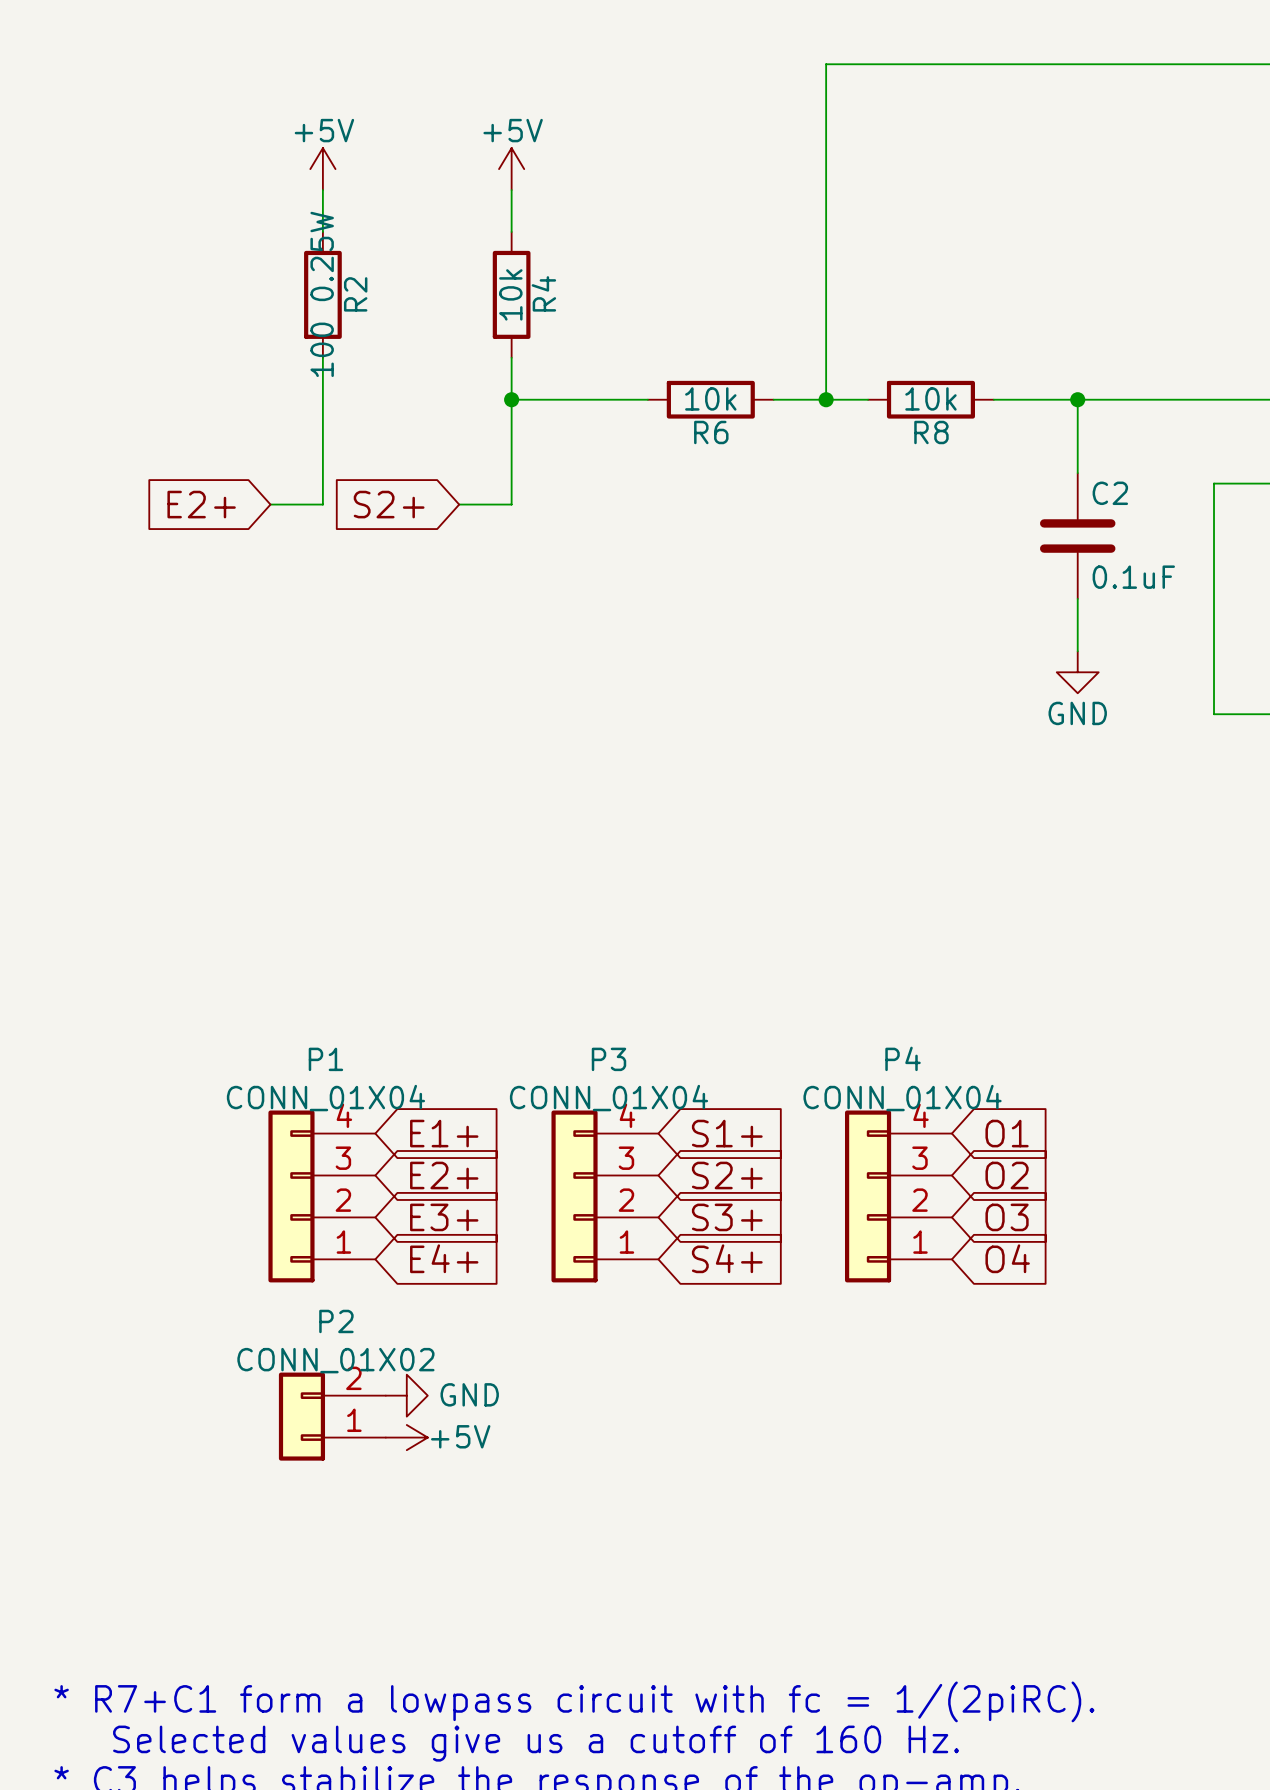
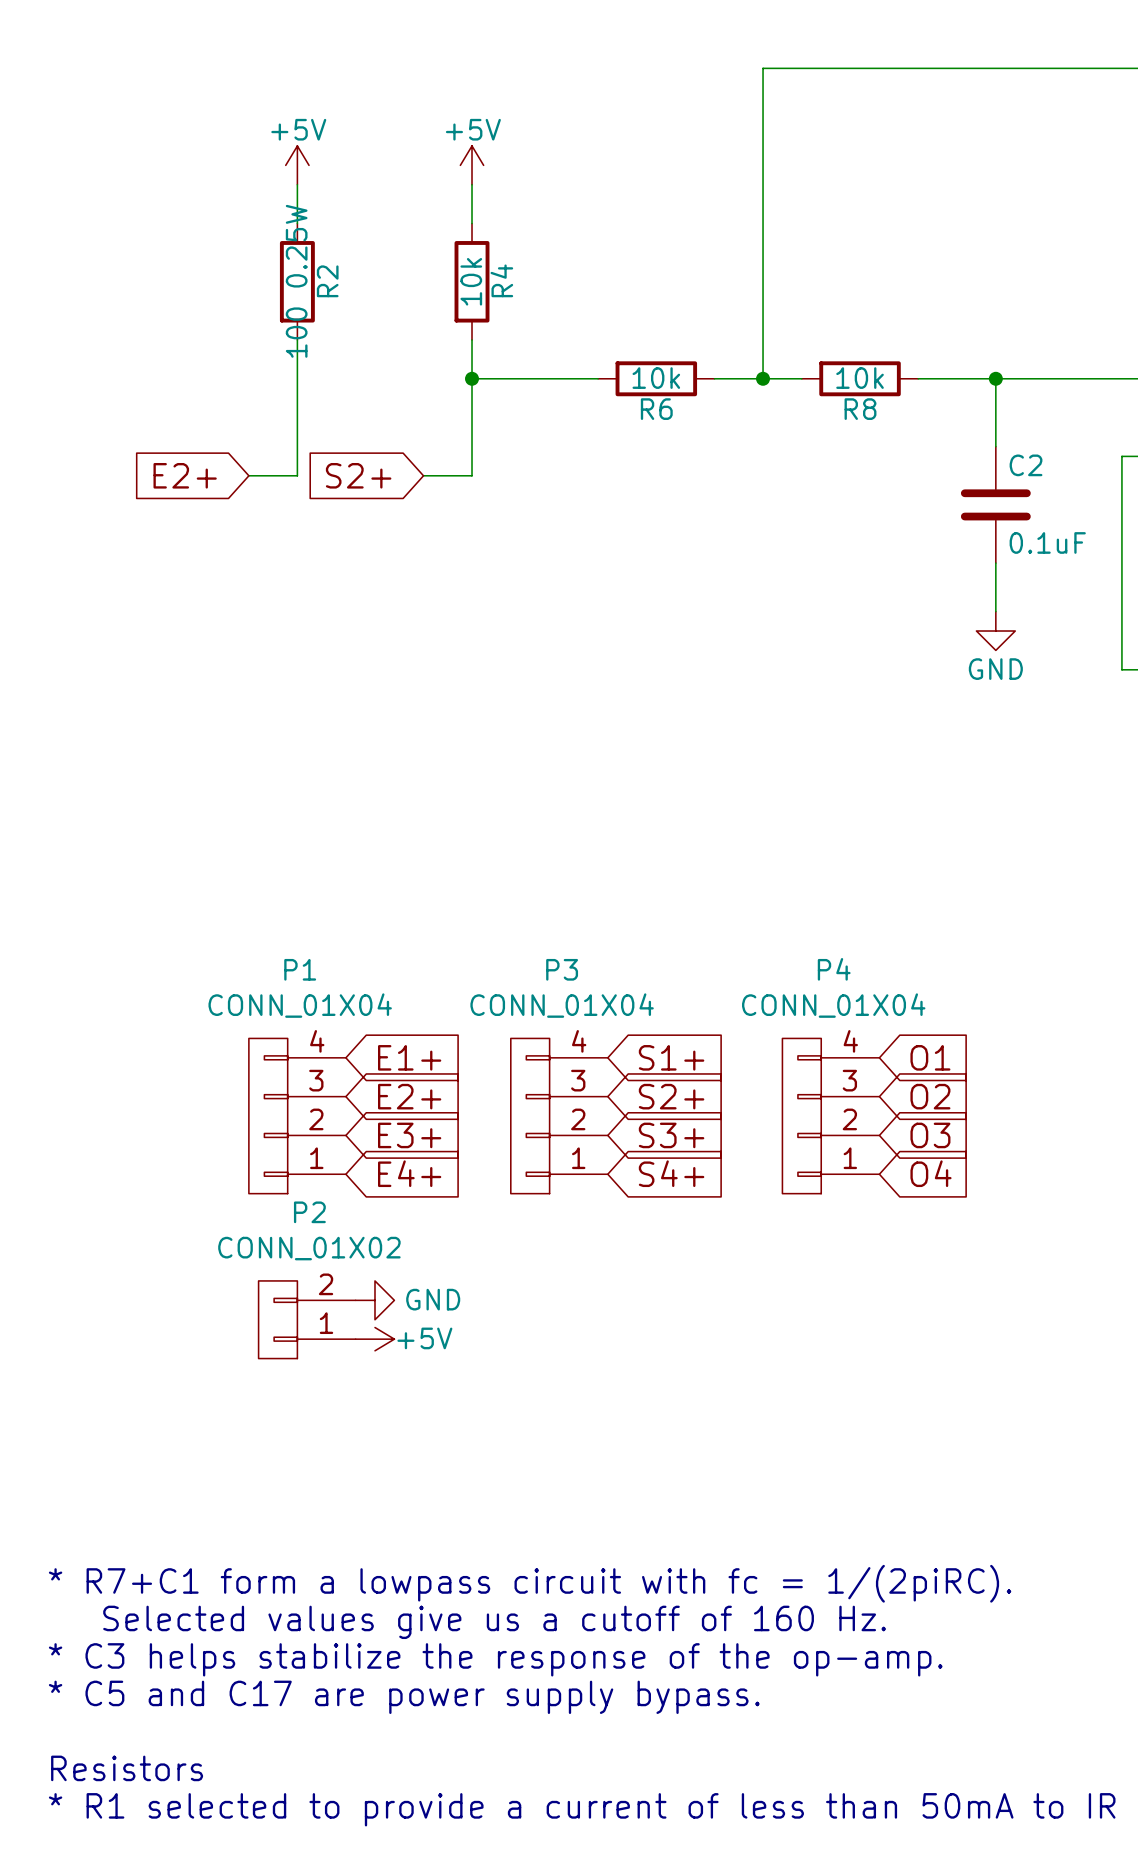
P1 symbol: [268, 1110, 376, 1283] -> [248, 1038, 346, 1194]
P3 symbol: [551, 1110, 659, 1283] -> [510, 1038, 608, 1194]
P4 symbol: [844, 1110, 952, 1283] -> [782, 1038, 880, 1194]
P2 symbol: [278, 1372, 386, 1461] -> [258, 1280, 356, 1359]

